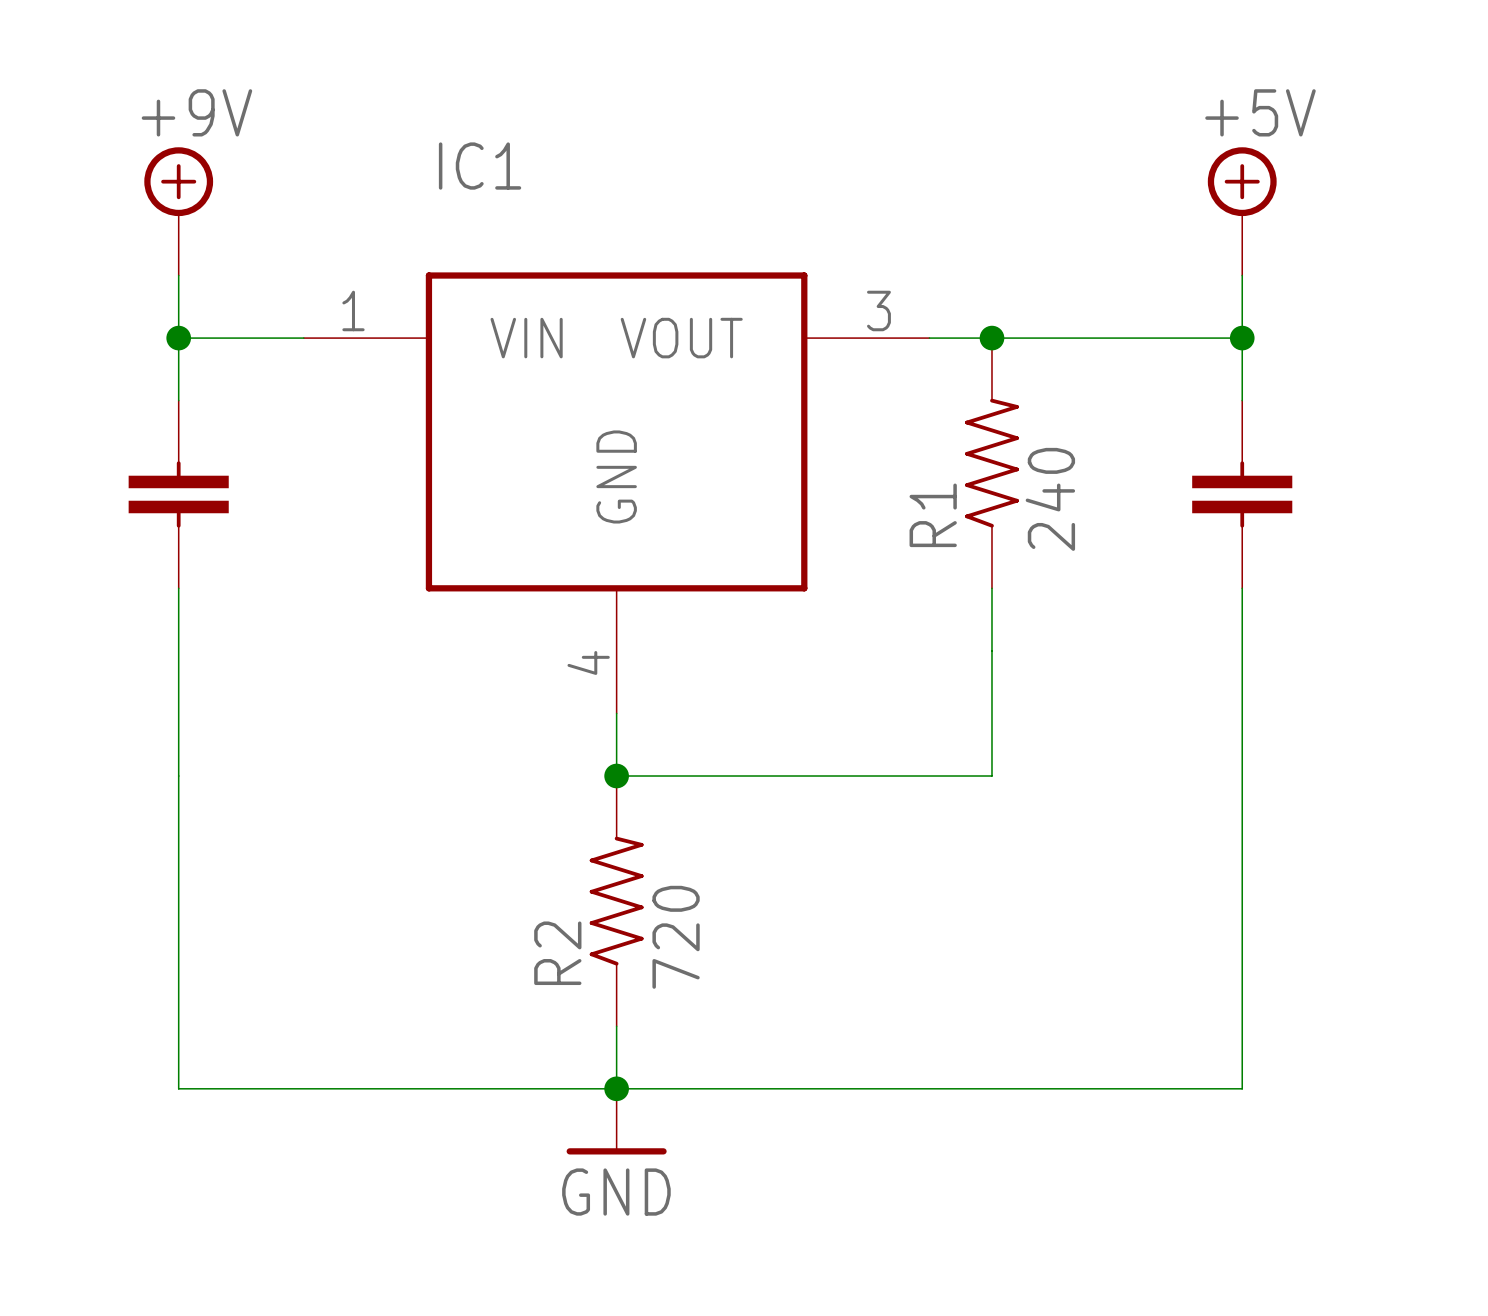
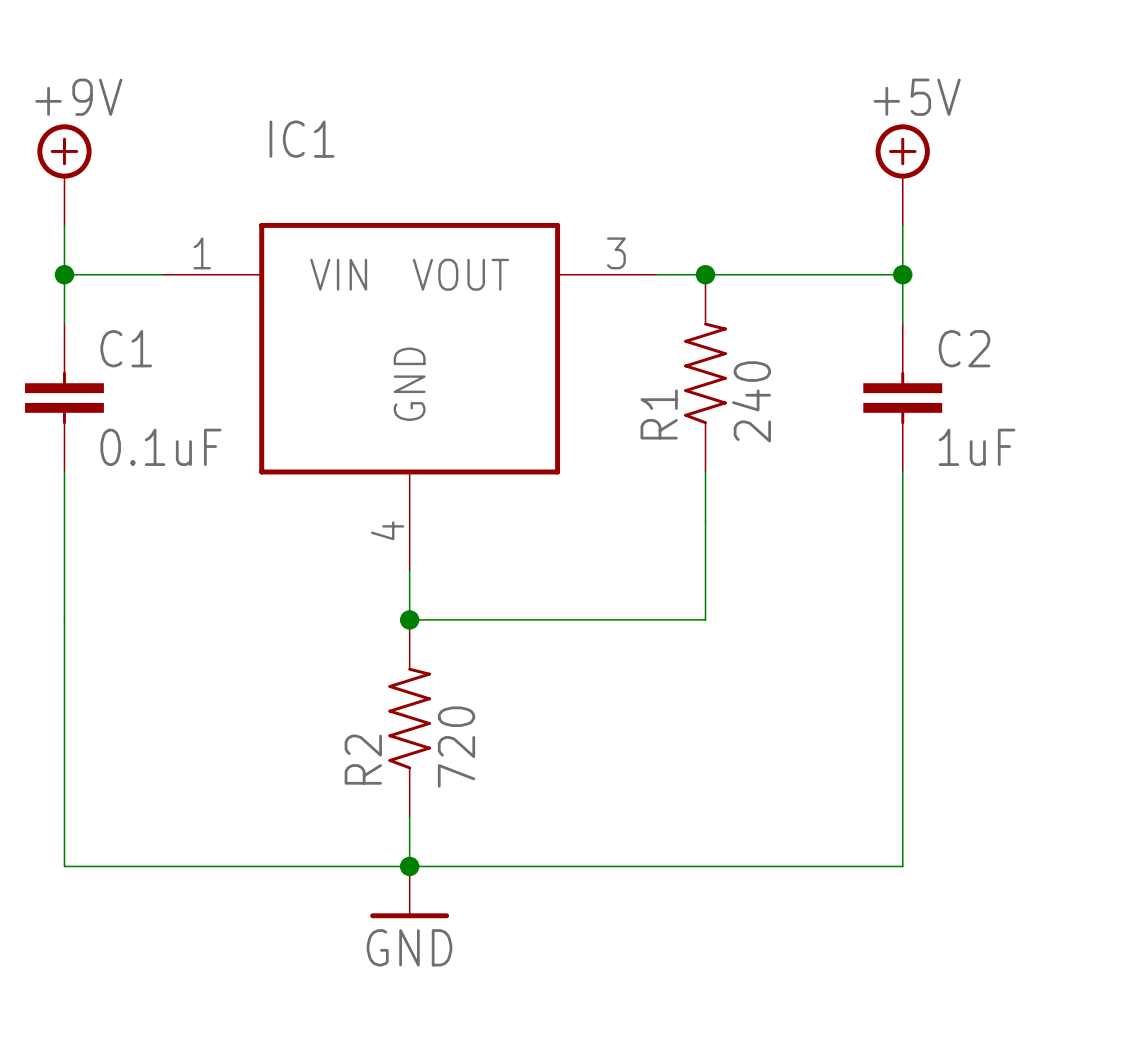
C1 name: none -> C1 (126, 348)
C2 name: none -> C2 (964, 348)
C1 value: none -> 0.1uF (160, 447)
C2 value: none -> 1uF (977, 447)

